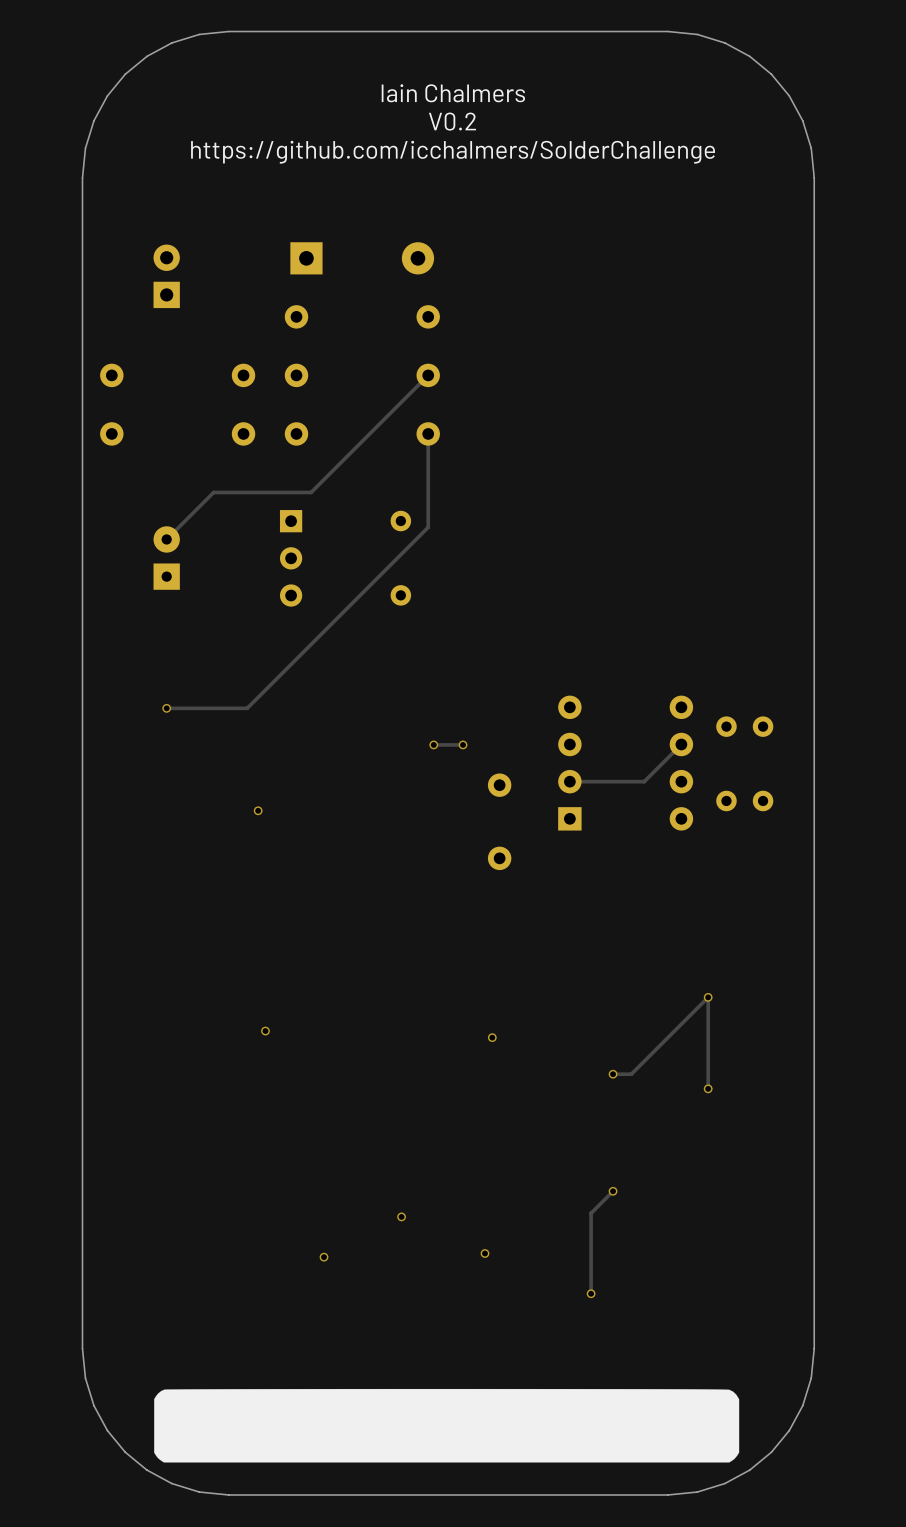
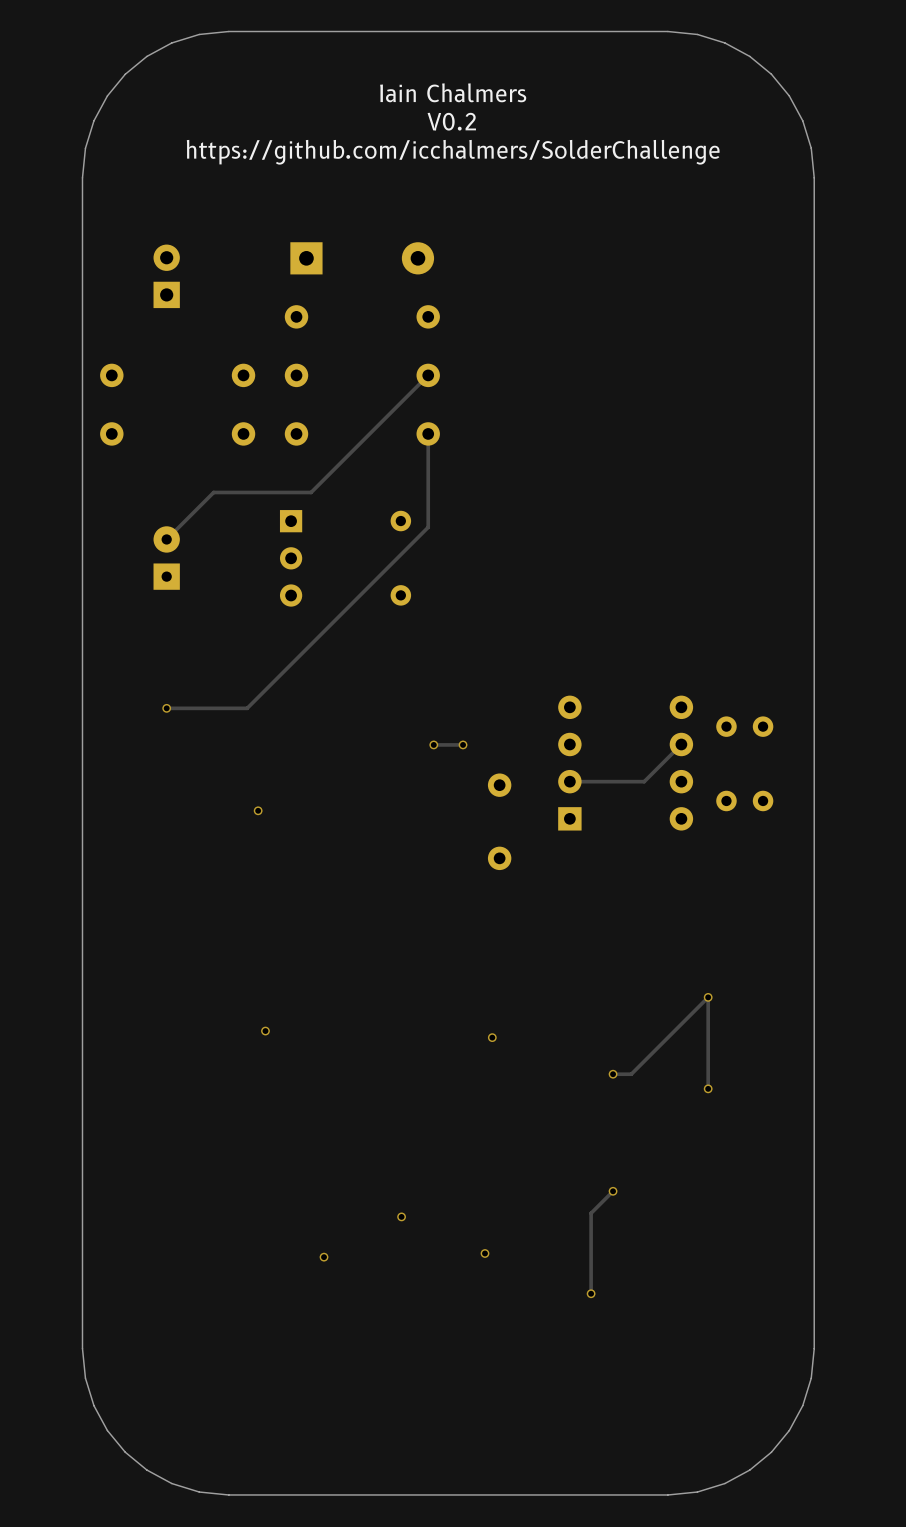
drawing: [154, 1388, 740, 1463] -> none

